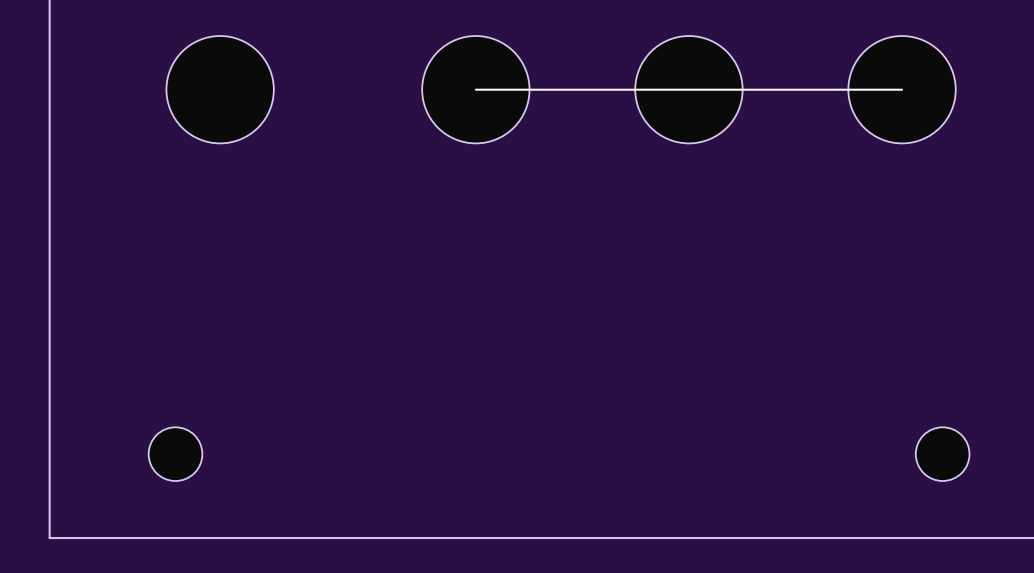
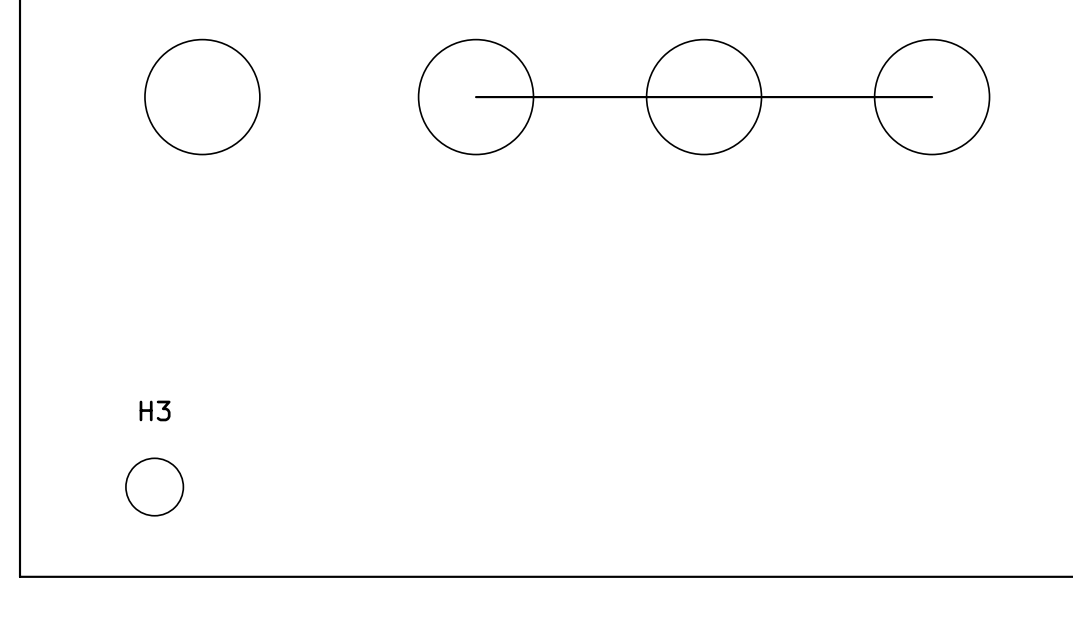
H3 name: none -> H3 (155, 410)
part: (942, 454) -> none

